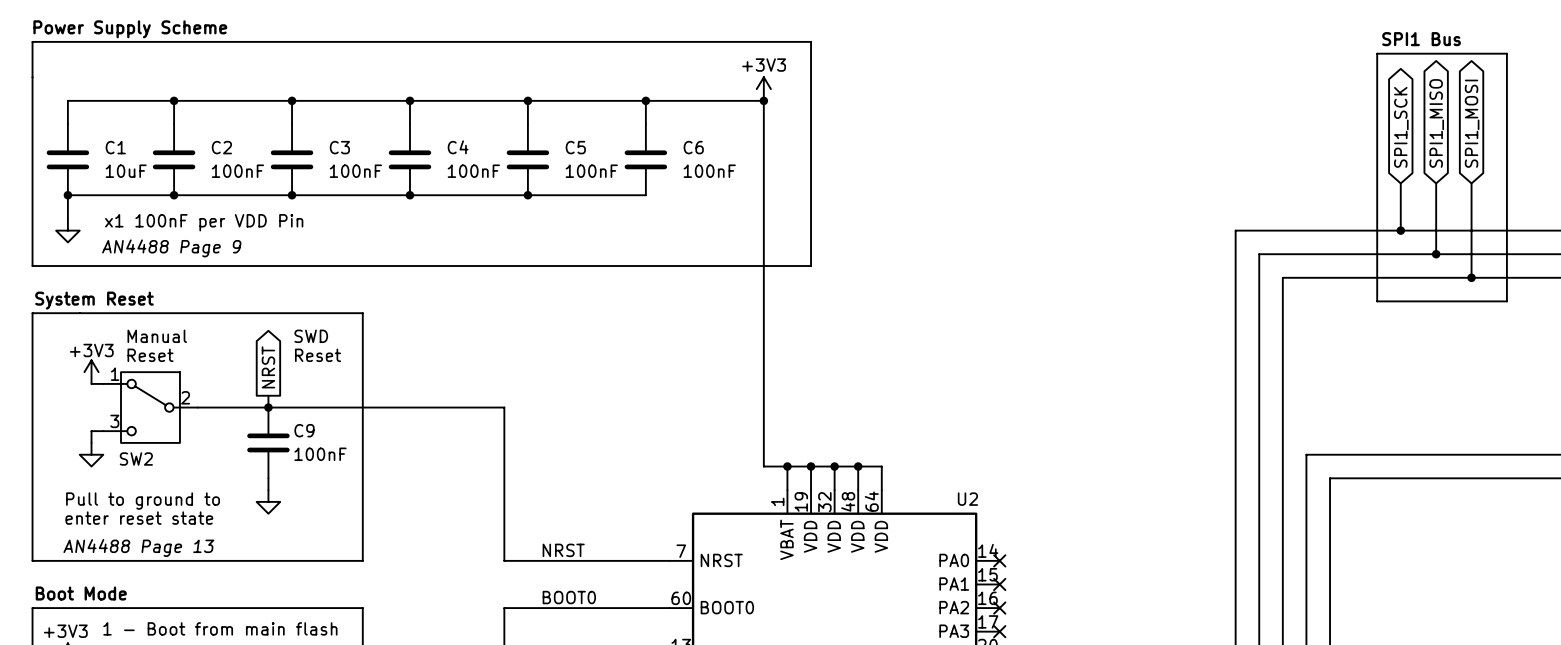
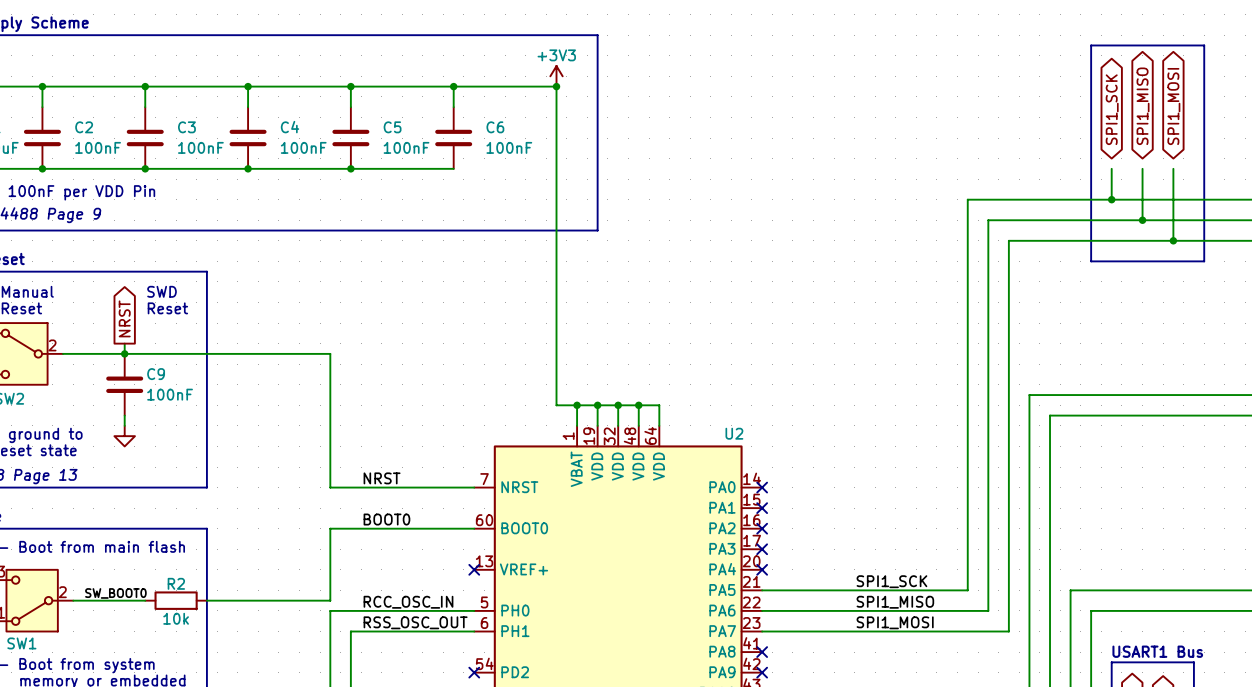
text: SPI1 Bus (1421, 39) -> none
wire: (1400, 183) (1400, 195) -> none
wire: (1436, 183) (1436, 195) -> none
wire: (1471, 183) (1471, 195) -> none

